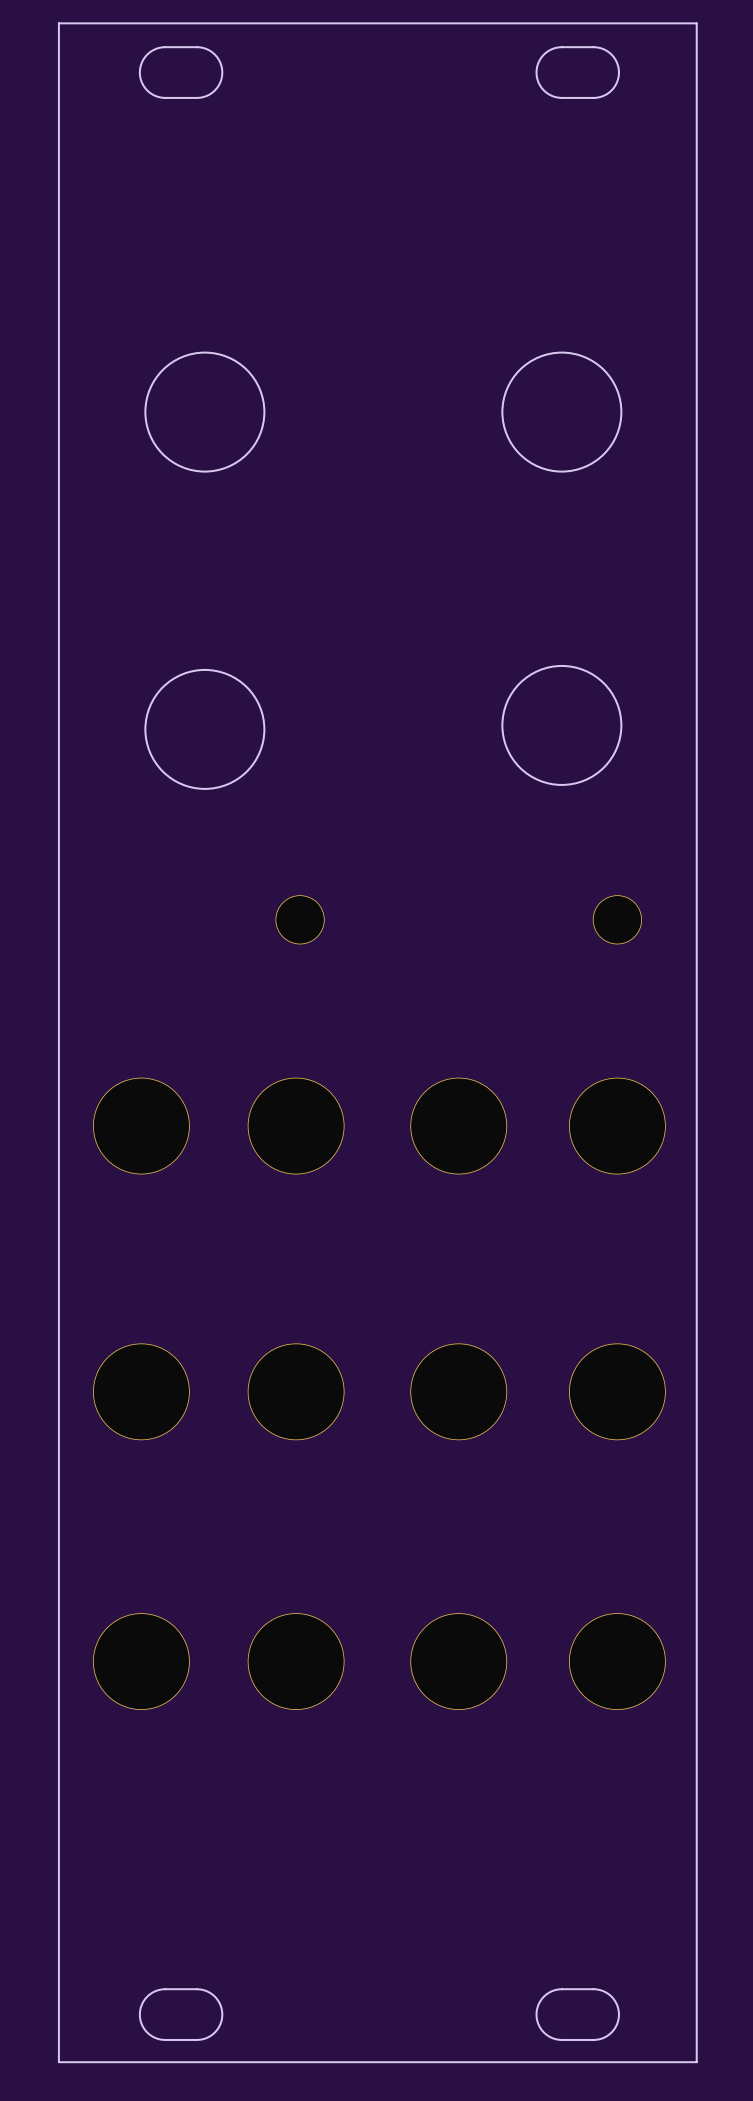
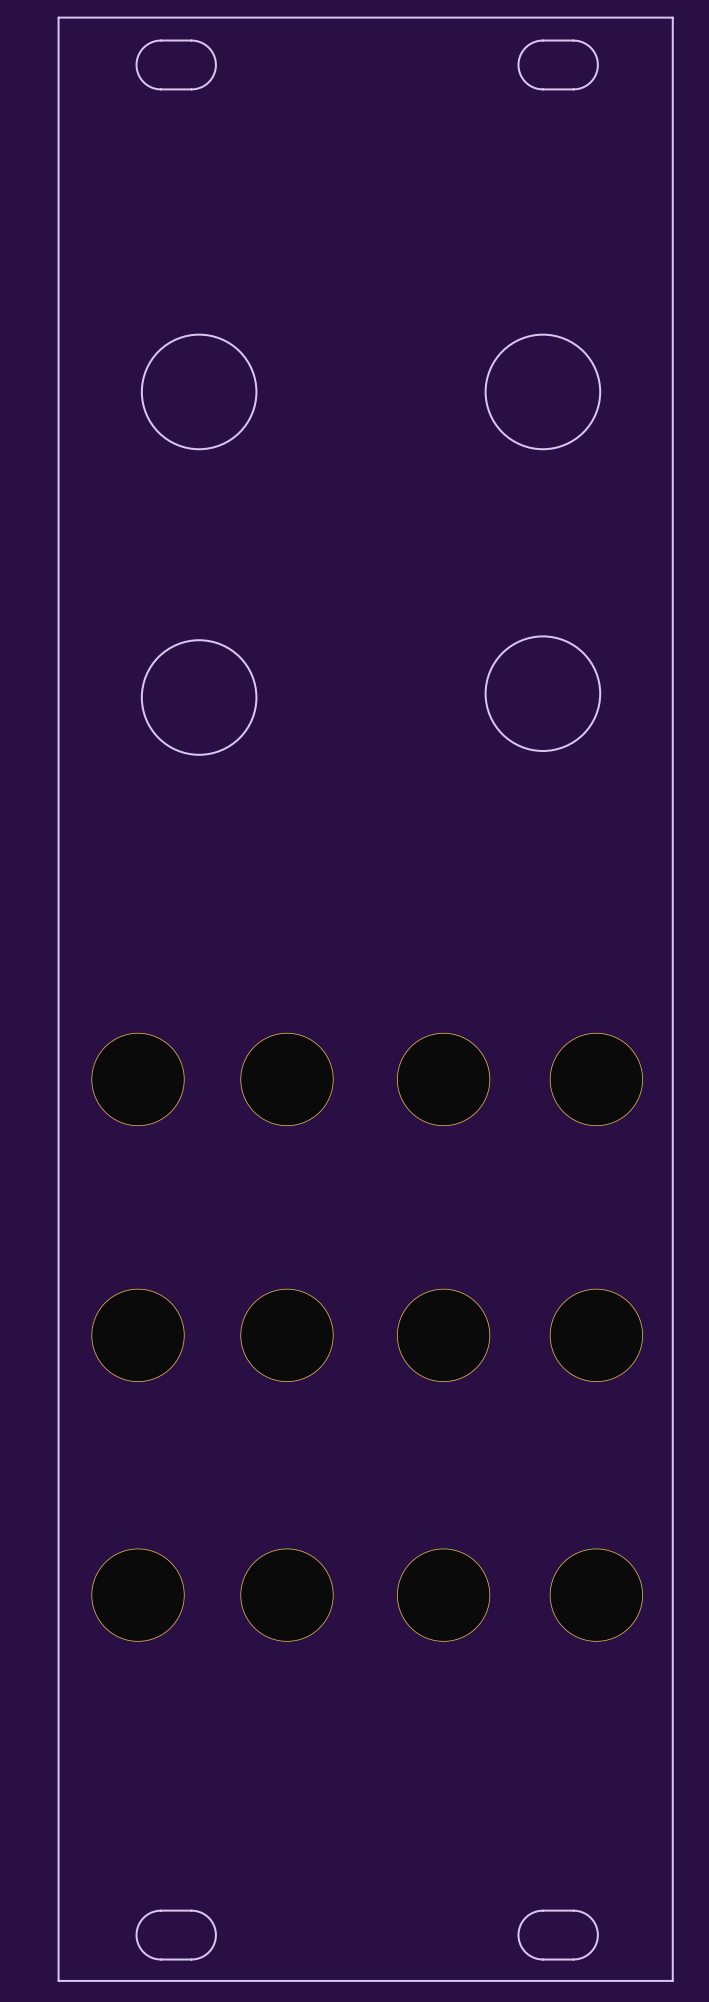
part: (300, 919) -> none
part: (617, 919) -> none

